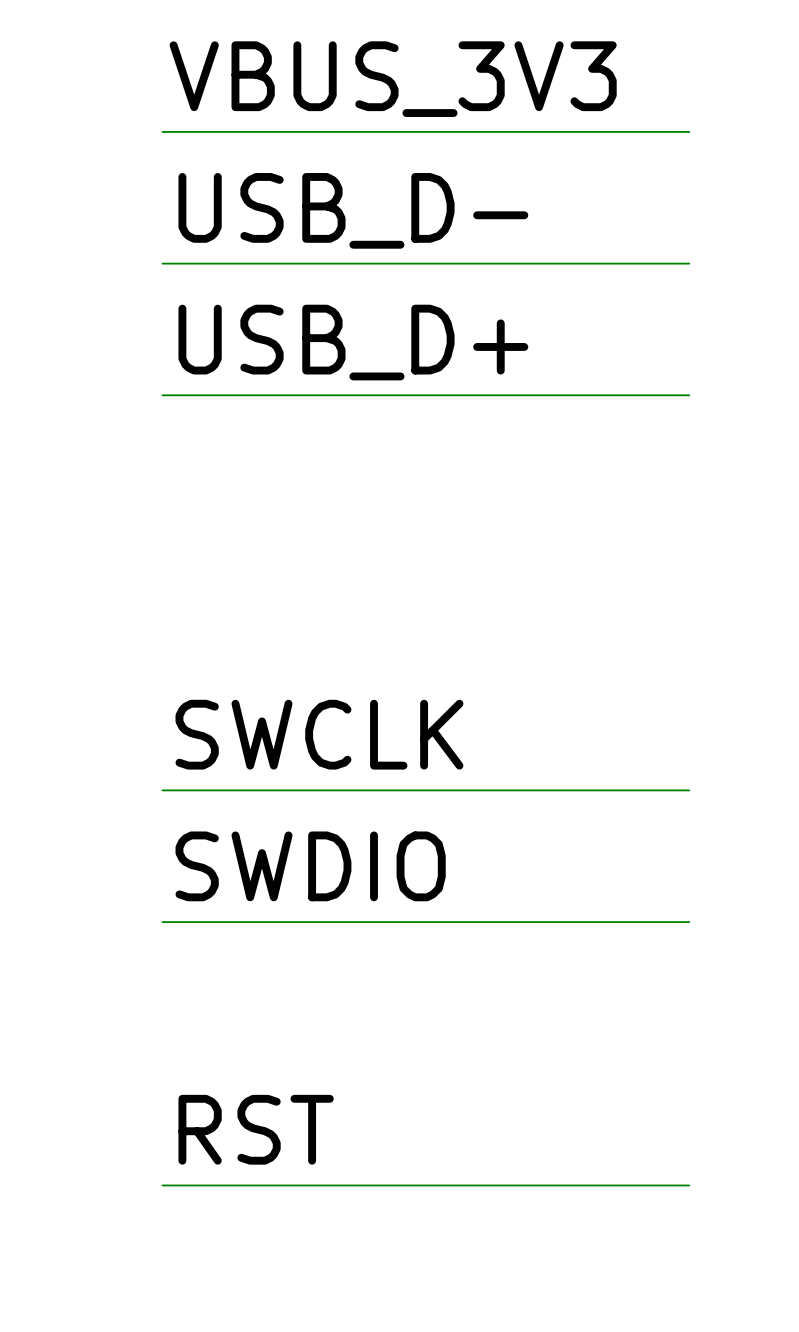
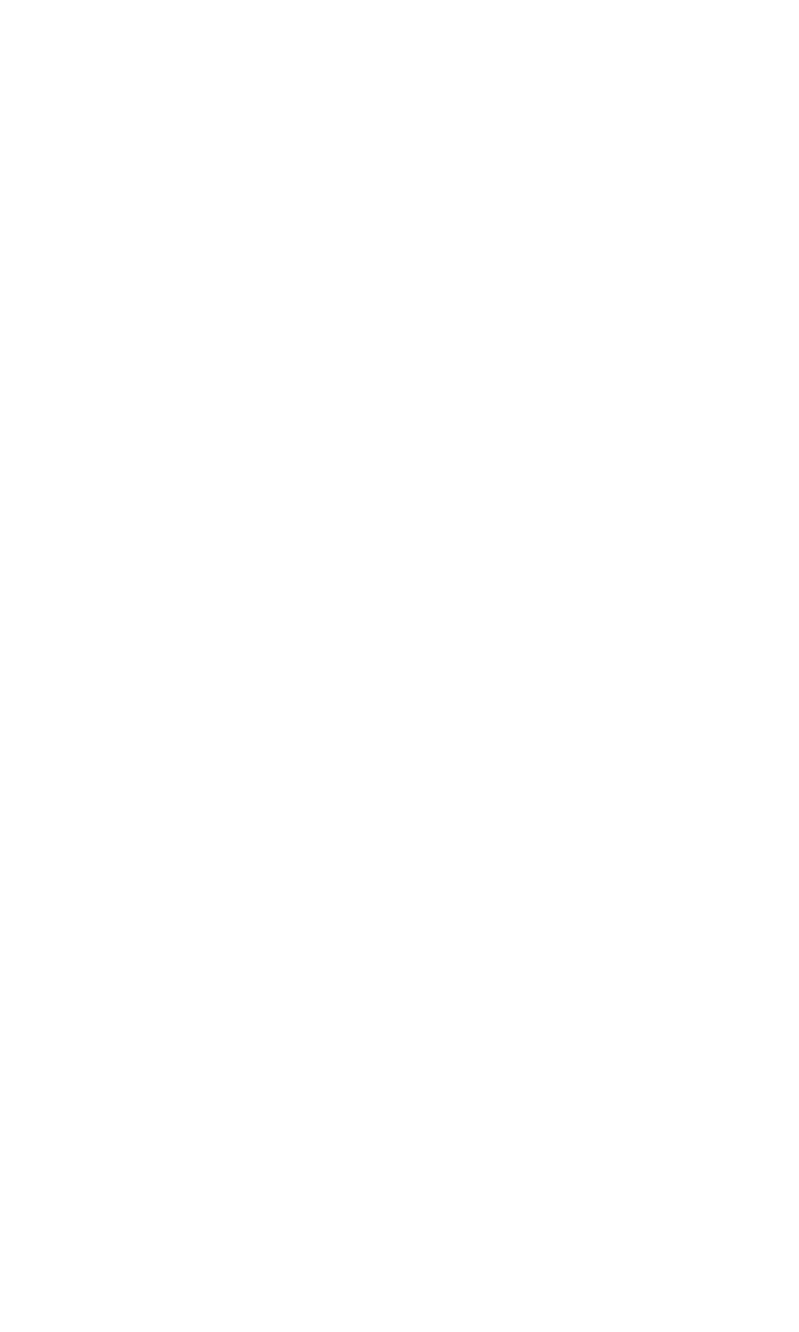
label: VBUS_3V3 (393, 79) -> none
wire: (162, 131) (689, 131) -> none
label: USB_D- (353, 210) -> none
wire: (162, 263) (689, 263) -> none
label: USB_D+ (353, 342) -> none
wire: (162, 395) (689, 395) -> none
label: SWCLK (319, 734) -> none
wire: (162, 790) (689, 790) -> none
label: SWDIO (310, 866) -> none
wire: (162, 922) (689, 922) -> none
label: RST (256, 1129) -> none
wire: (162, 1185) (689, 1185) -> none

